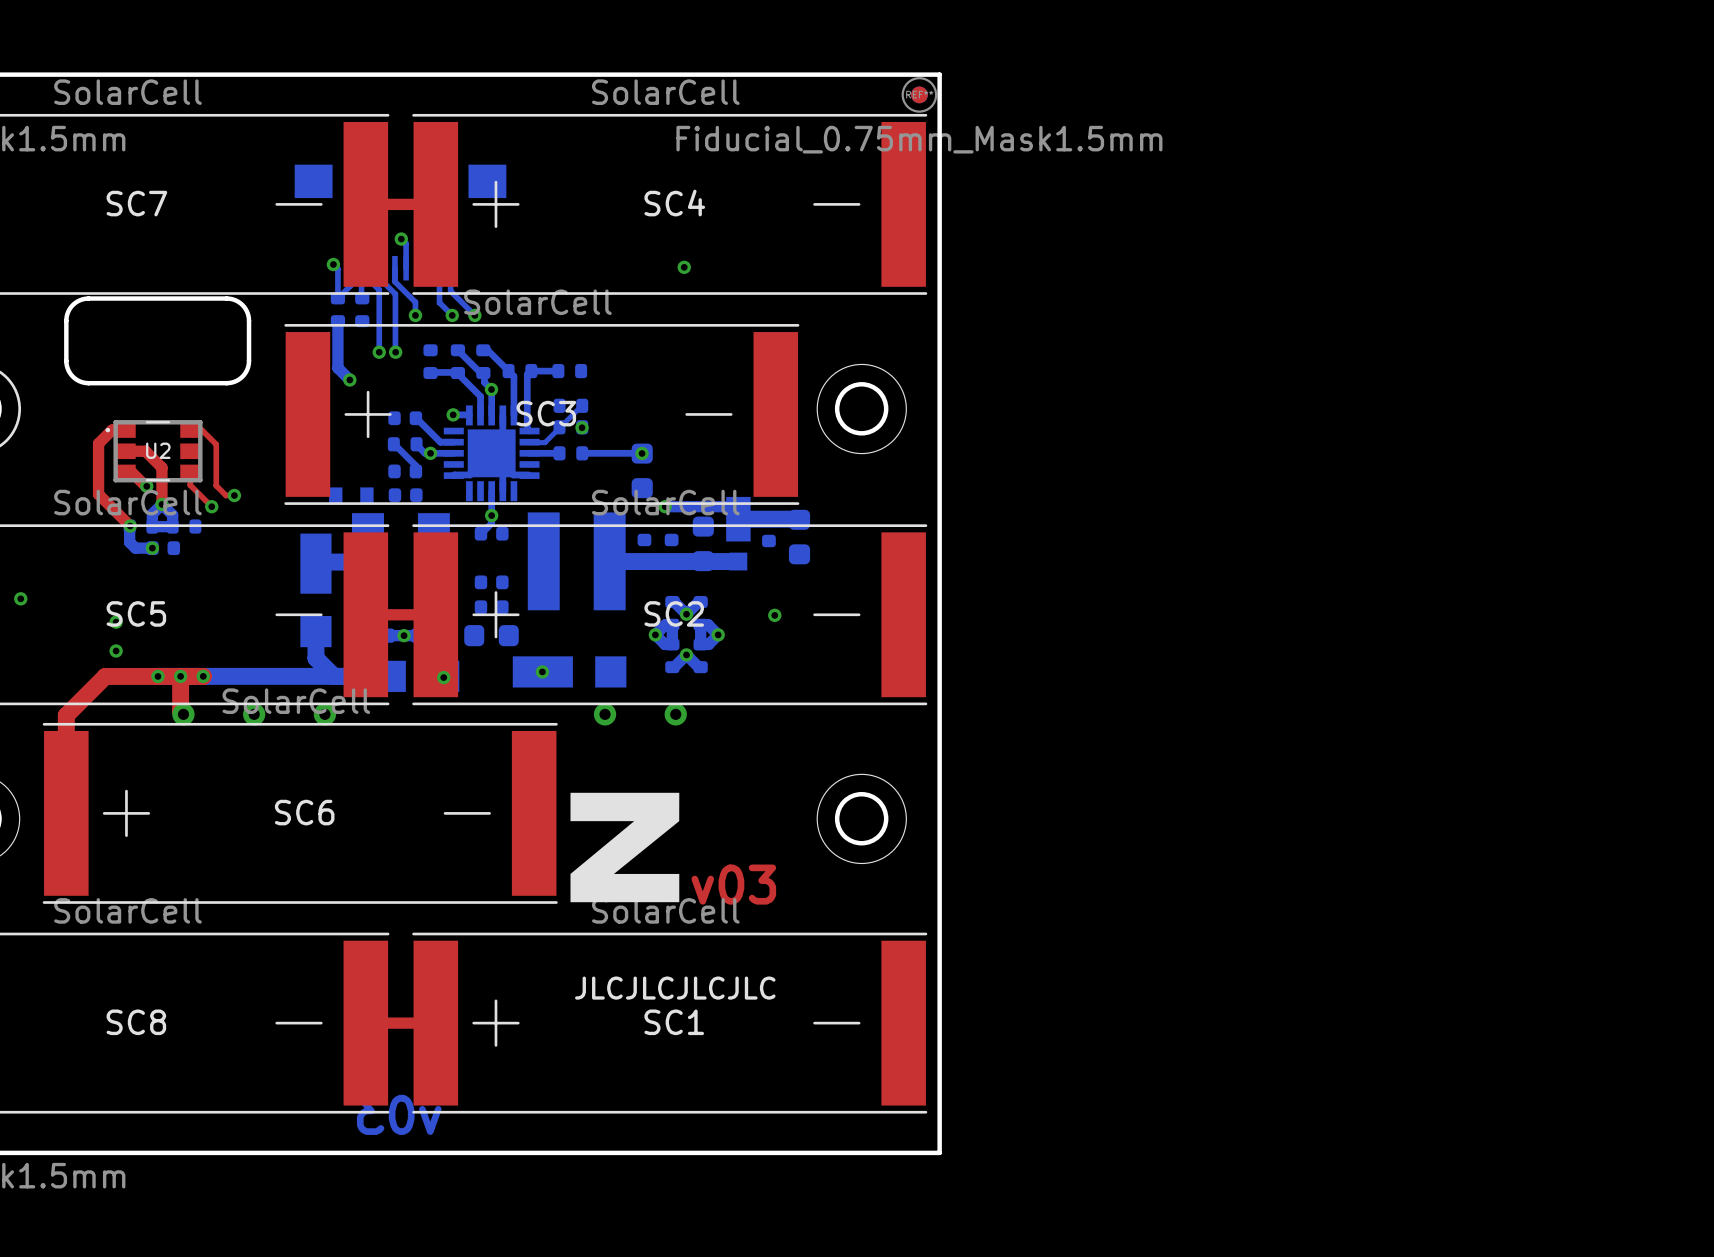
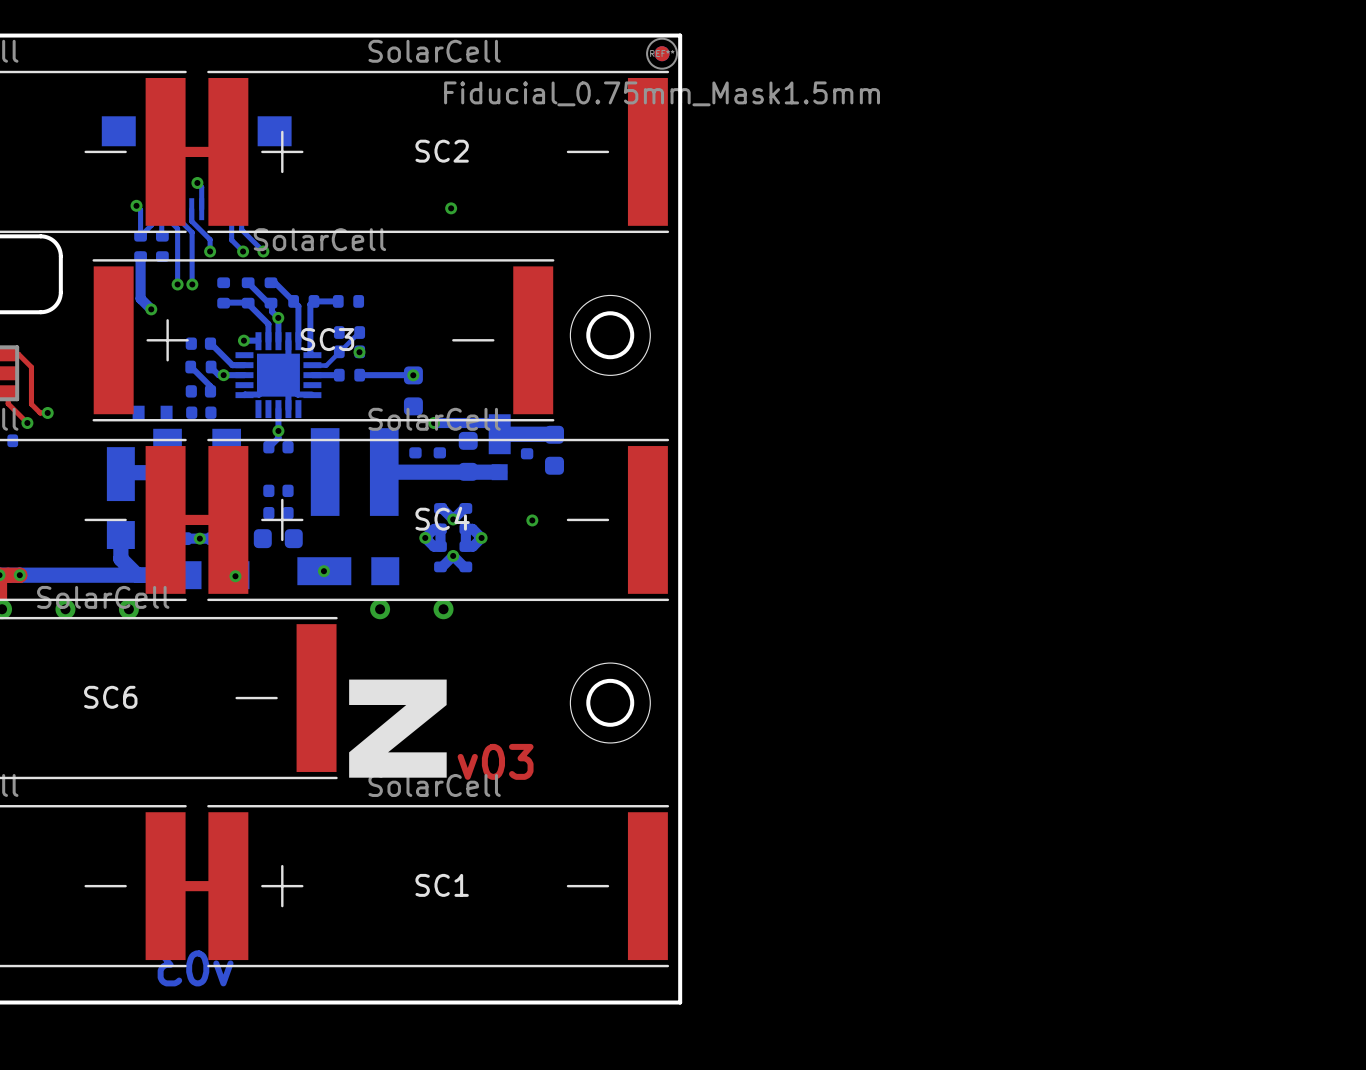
SC4 name: SC4 (674, 203) -> SC2 (442, 151)
SC2 name: SC2 (674, 613) -> SC4 (442, 518)
text: JLCJLCJLCJLC (675, 988) -> none

